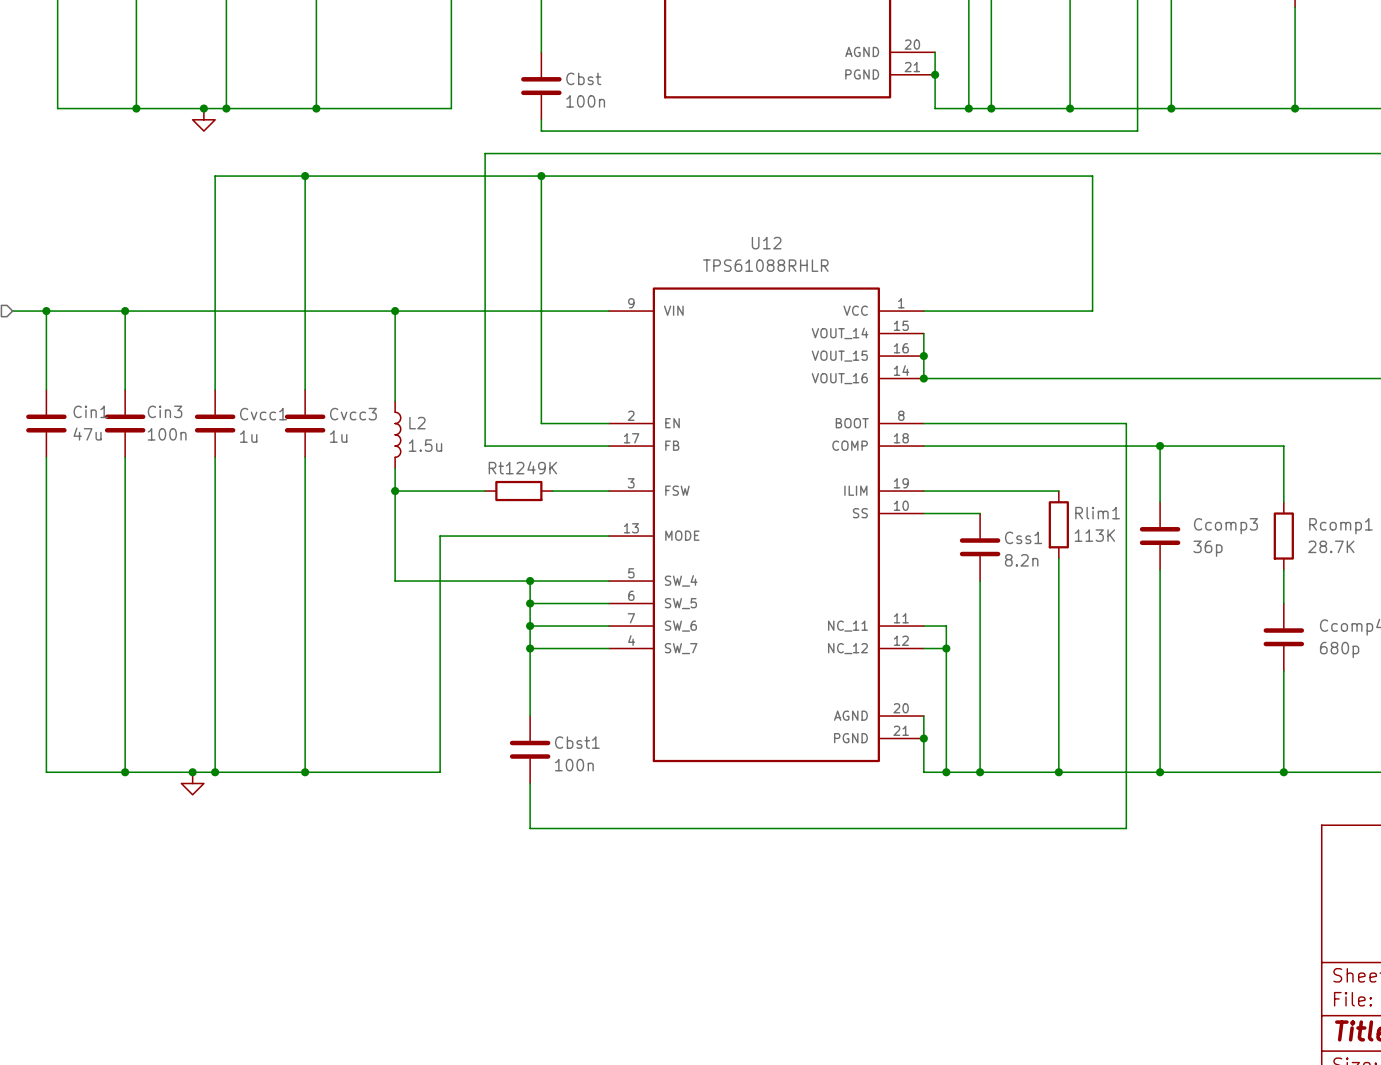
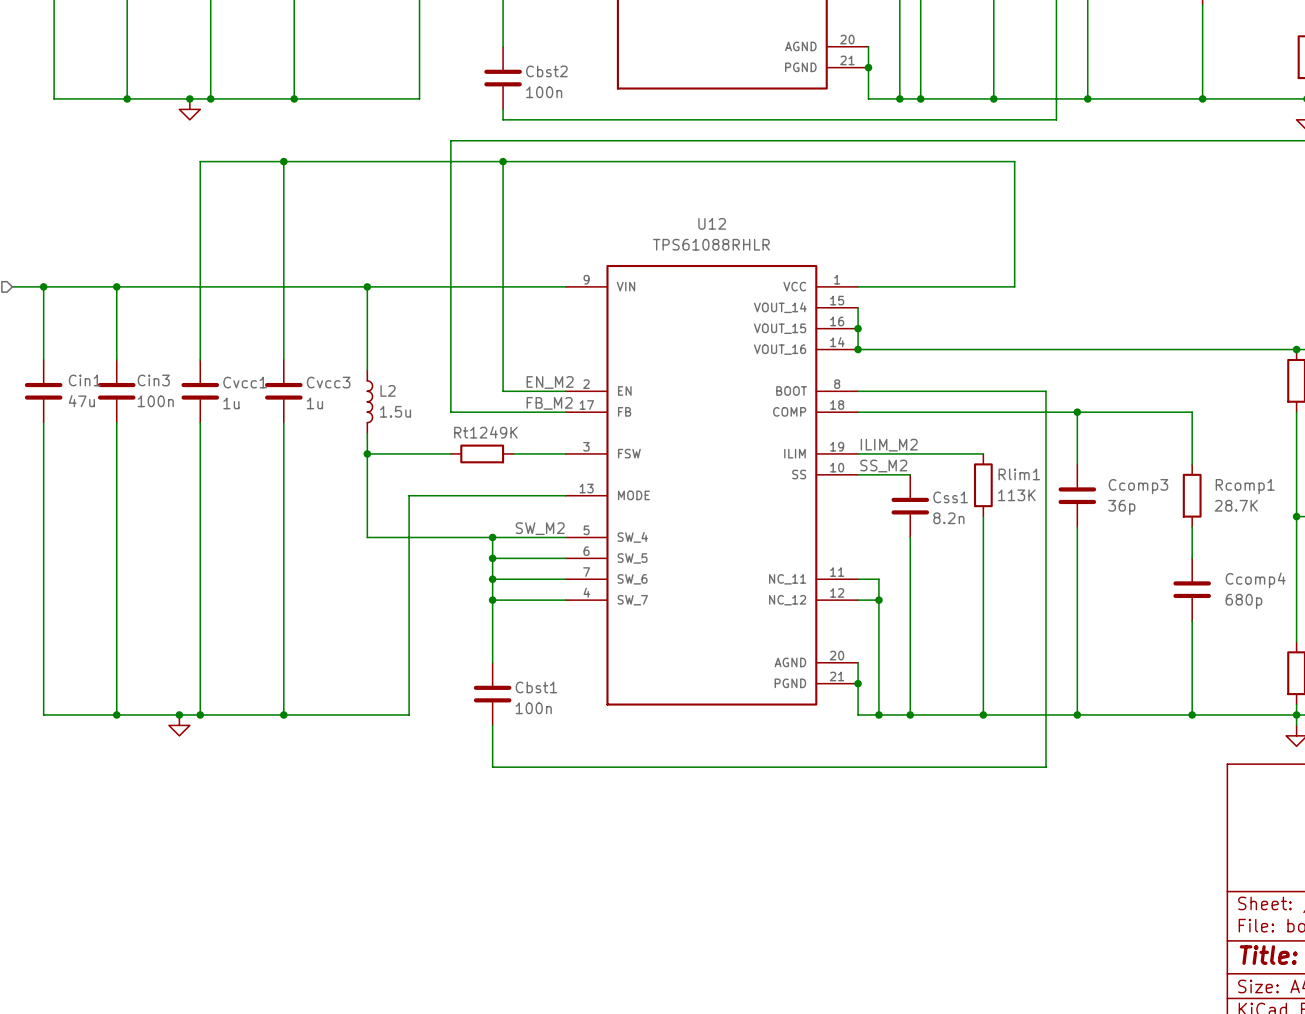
Cbst name: Cbst (583, 78) -> Cbst2 (546, 71)
label: none -> EN_M2 (550, 382)
label: none -> FB_M2 (549, 403)
label: none -> ILIM_M2 (889, 445)
label: none -> SS_M2 (883, 466)
label: none -> SW_M2 (540, 528)

